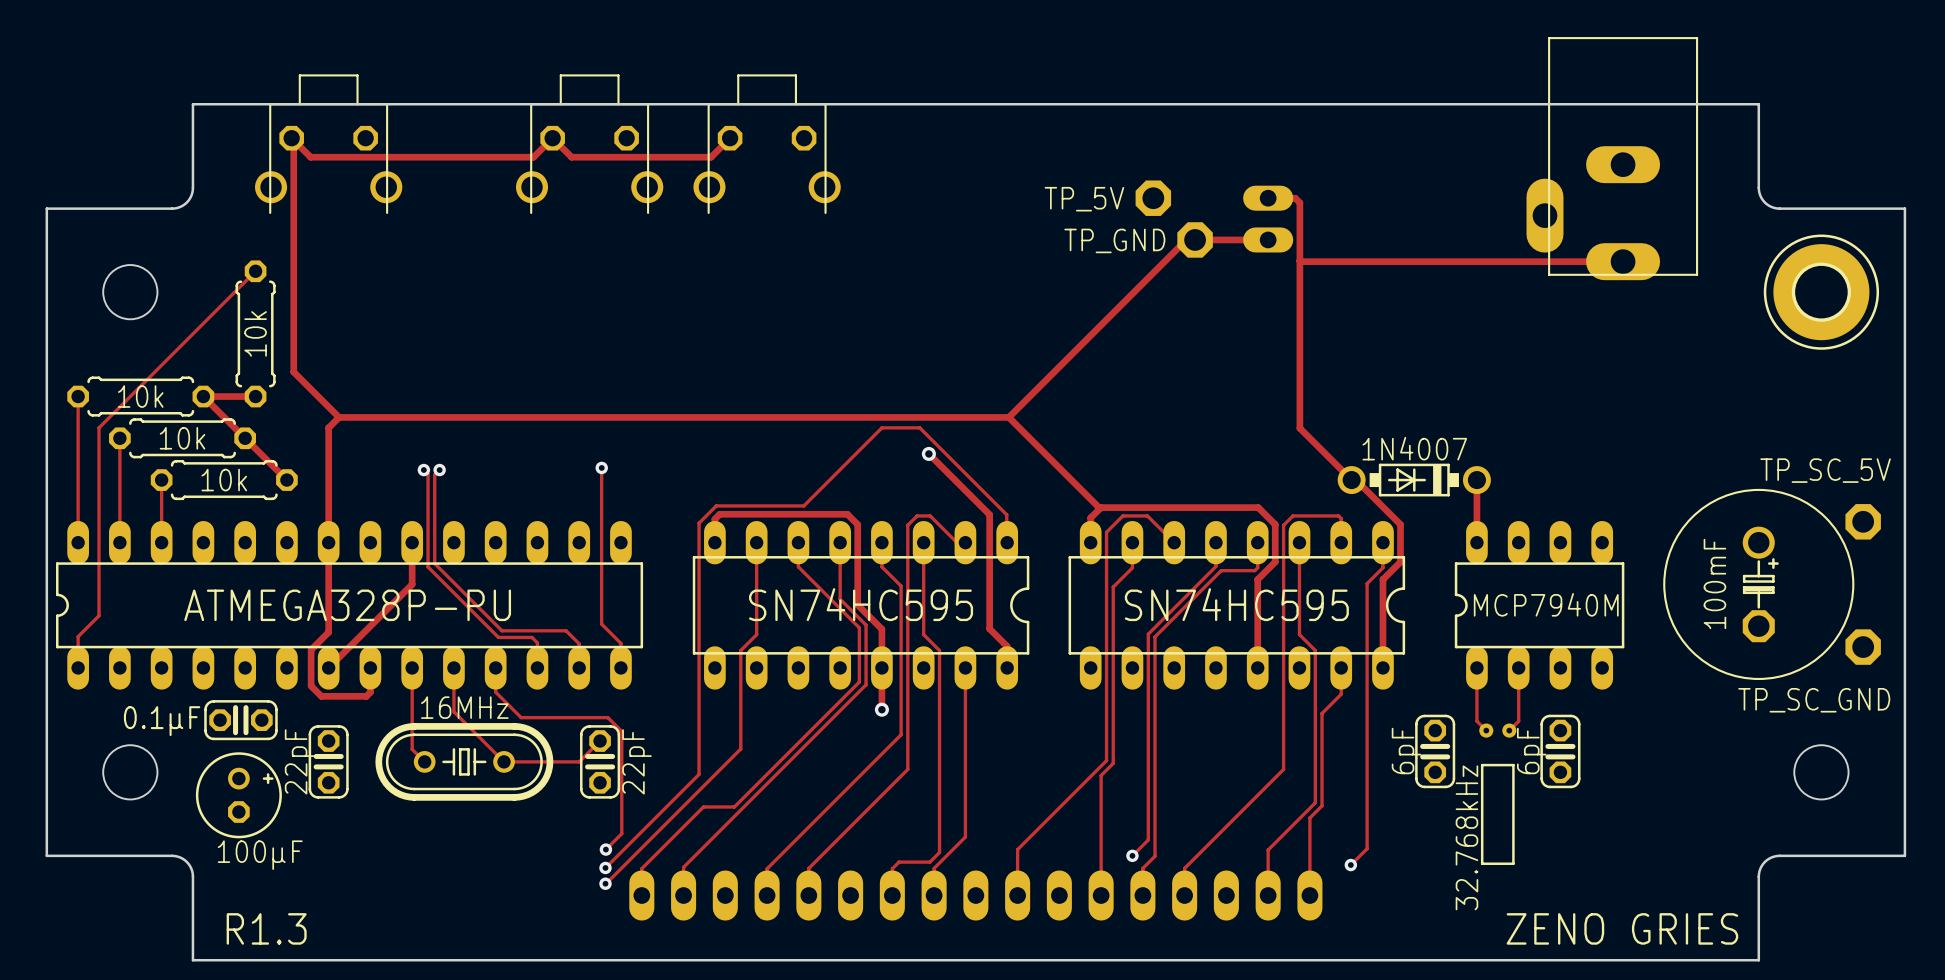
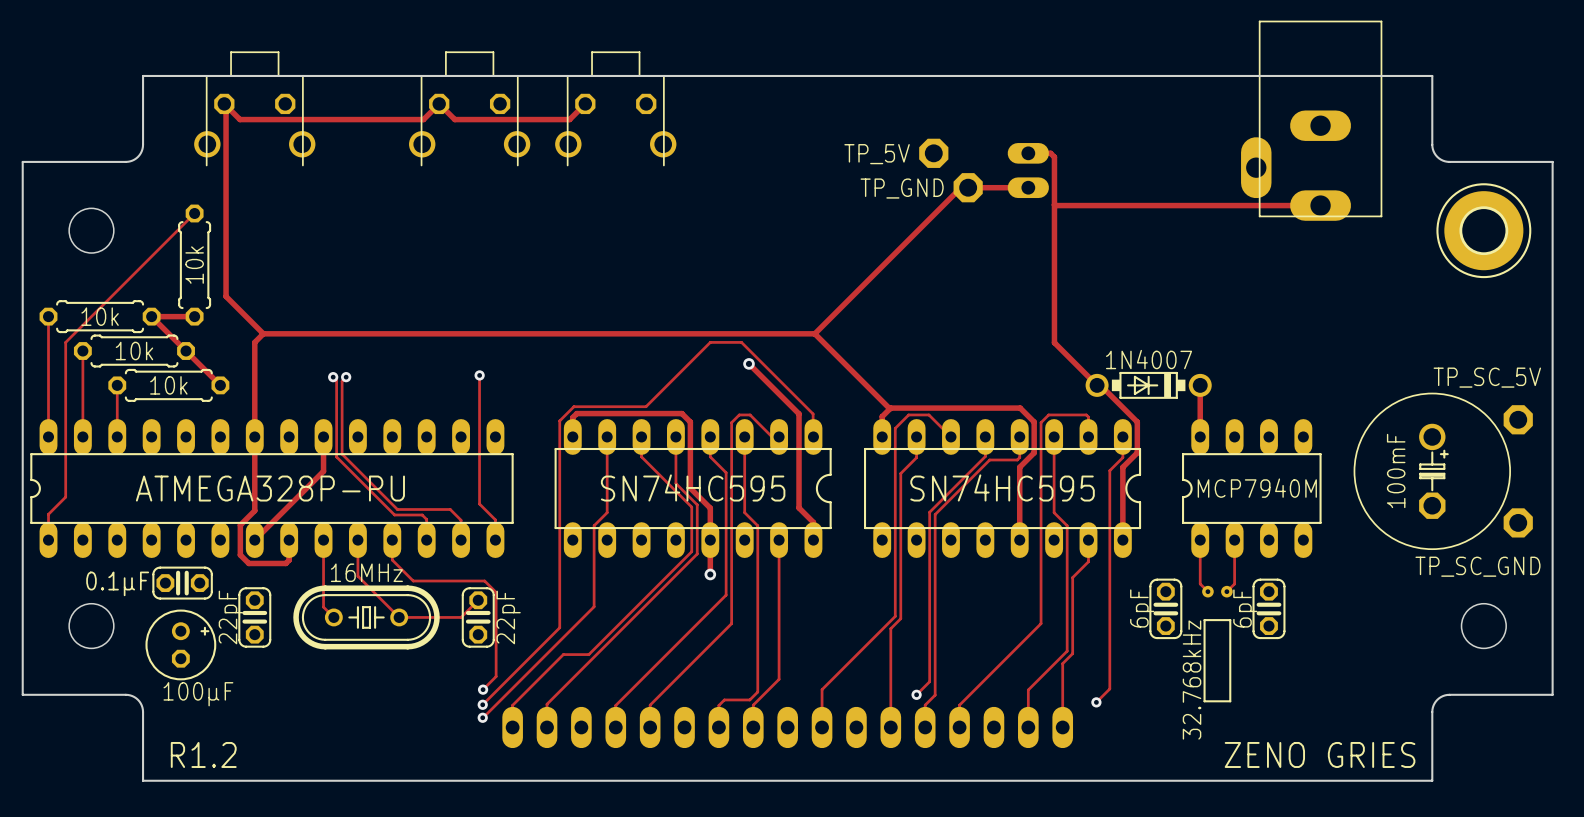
text: R1.3 (266, 928) -> R1.2 (203, 754)

